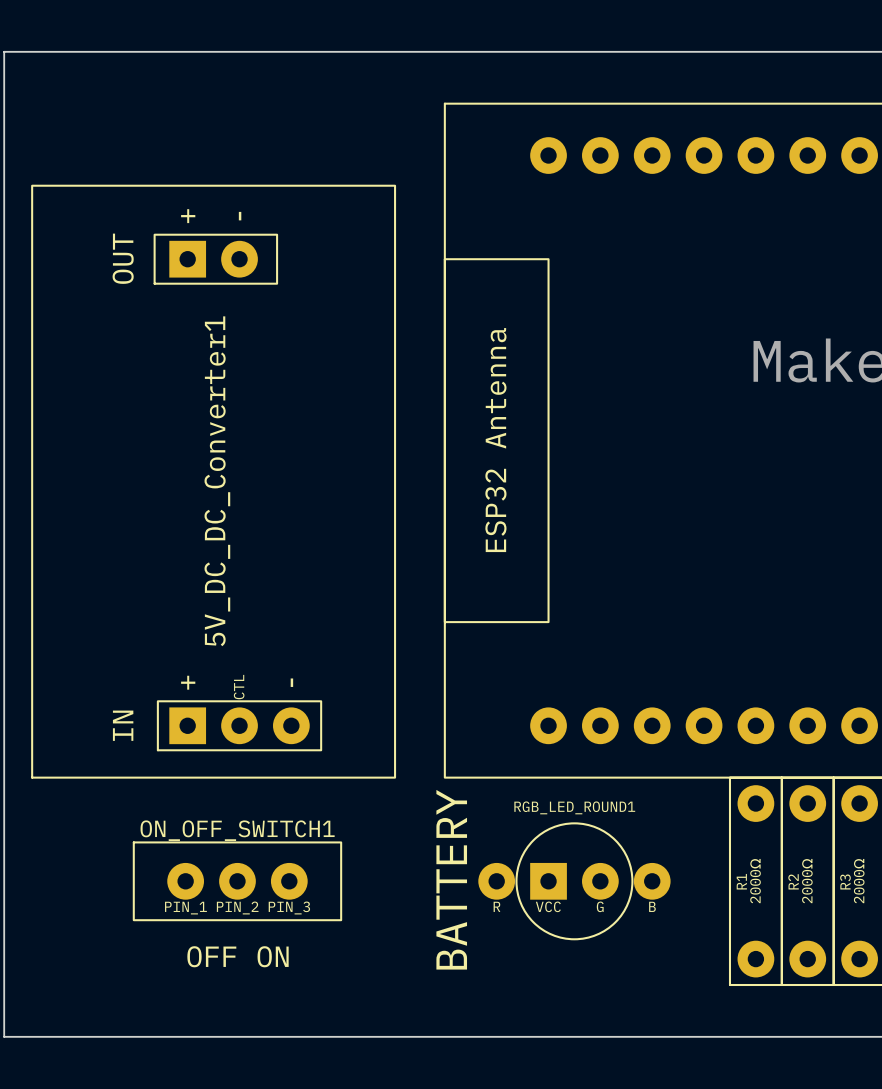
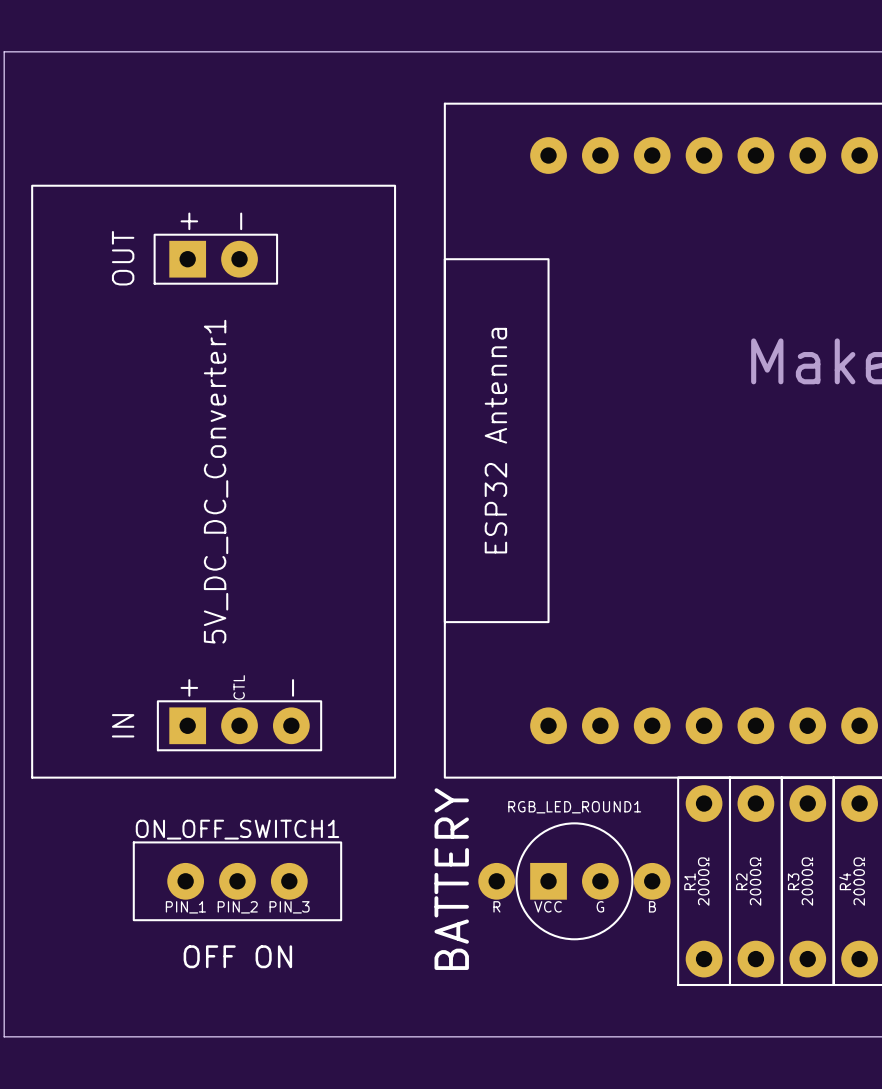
R1: none -> 2000Ω (704, 881)
R1 name: R1 (741, 881) -> R2 (741, 881)
R2 name: R2 (793, 881) -> R3 (793, 881)
R3 name: R3 (845, 881) -> R4 (845, 881)

